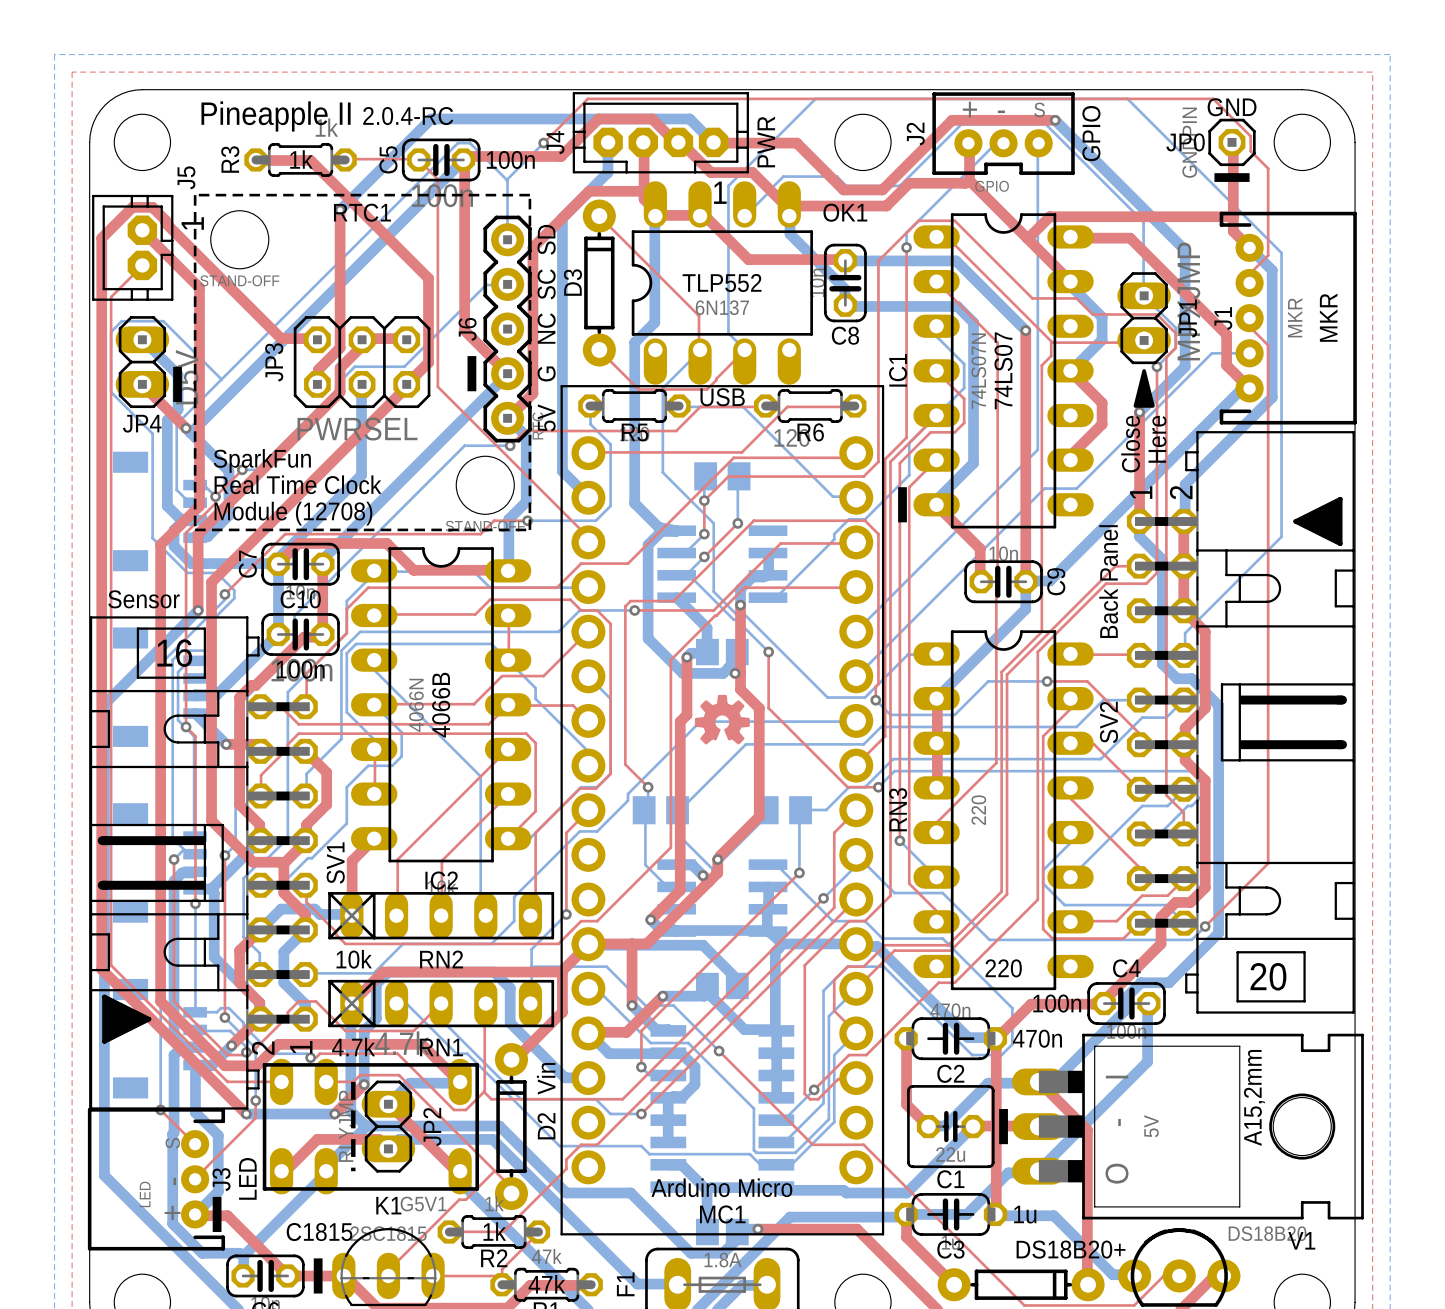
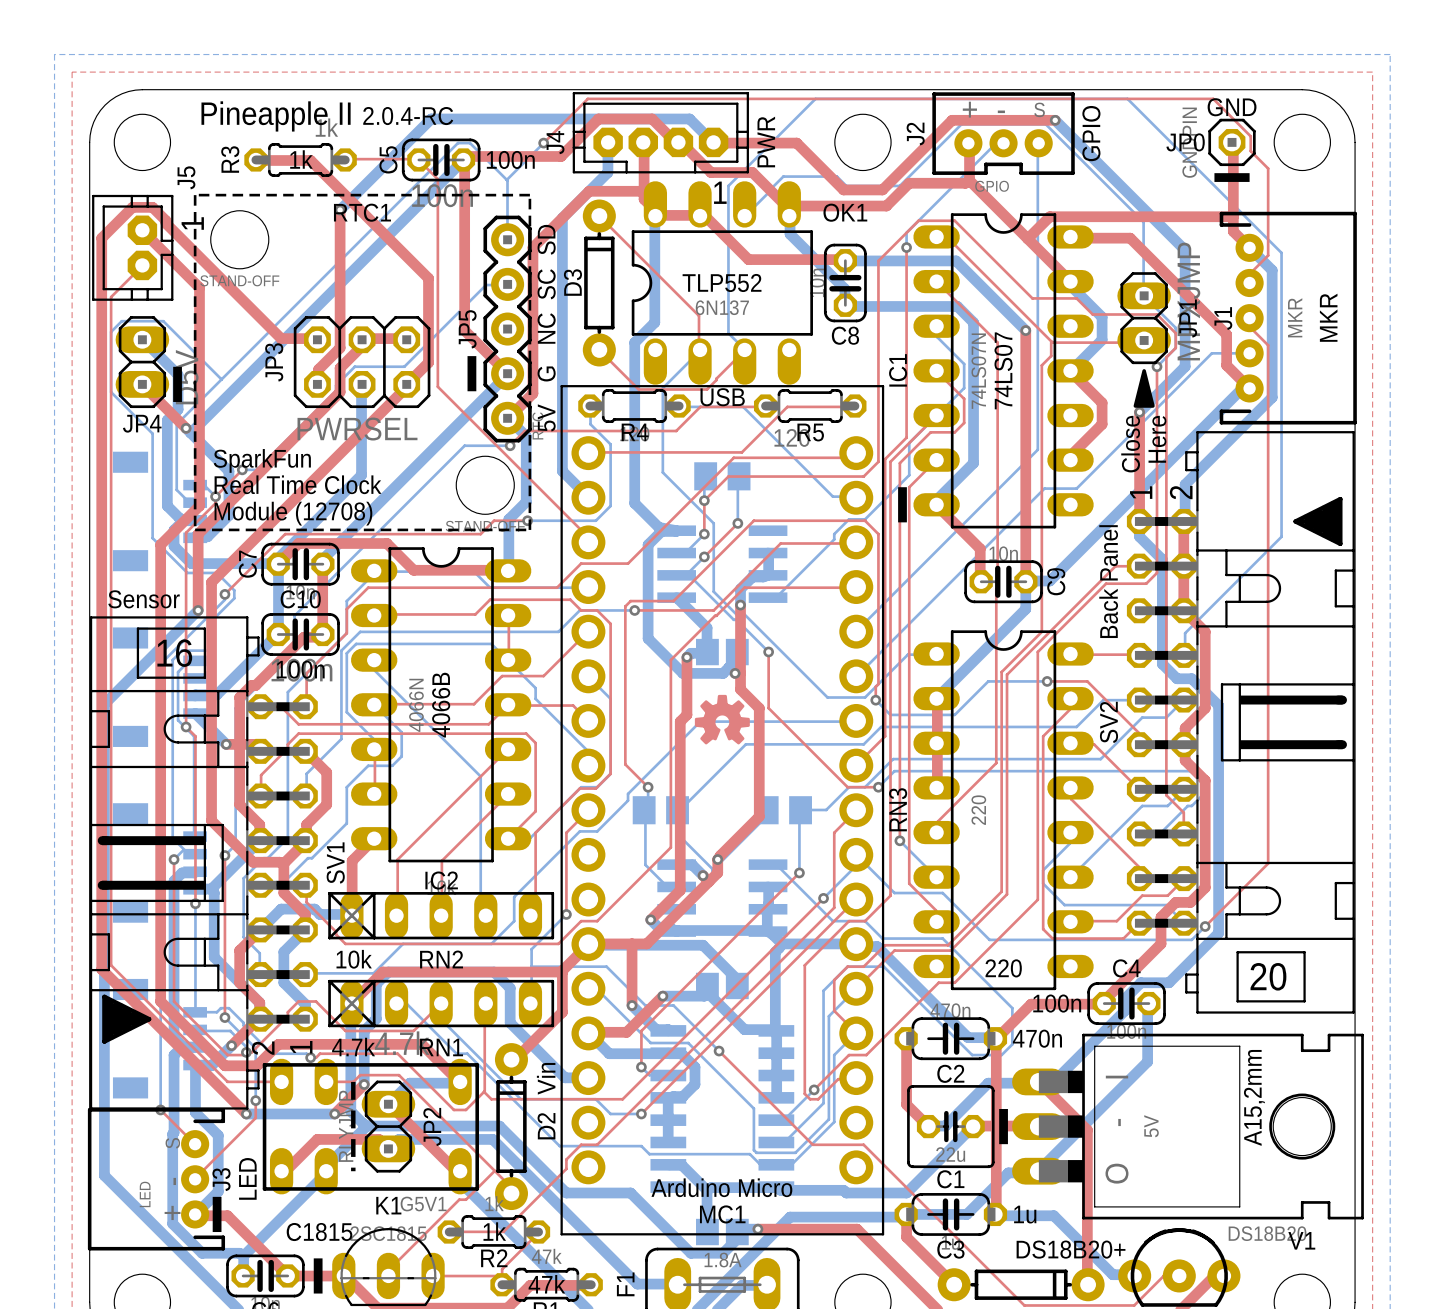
J6 name: J6 (467, 329) -> JP5 (467, 329)
R5 name: R5 (634, 432) -> R4 (635, 432)
R6 name: R6 (810, 432) -> R5 (810, 432)

